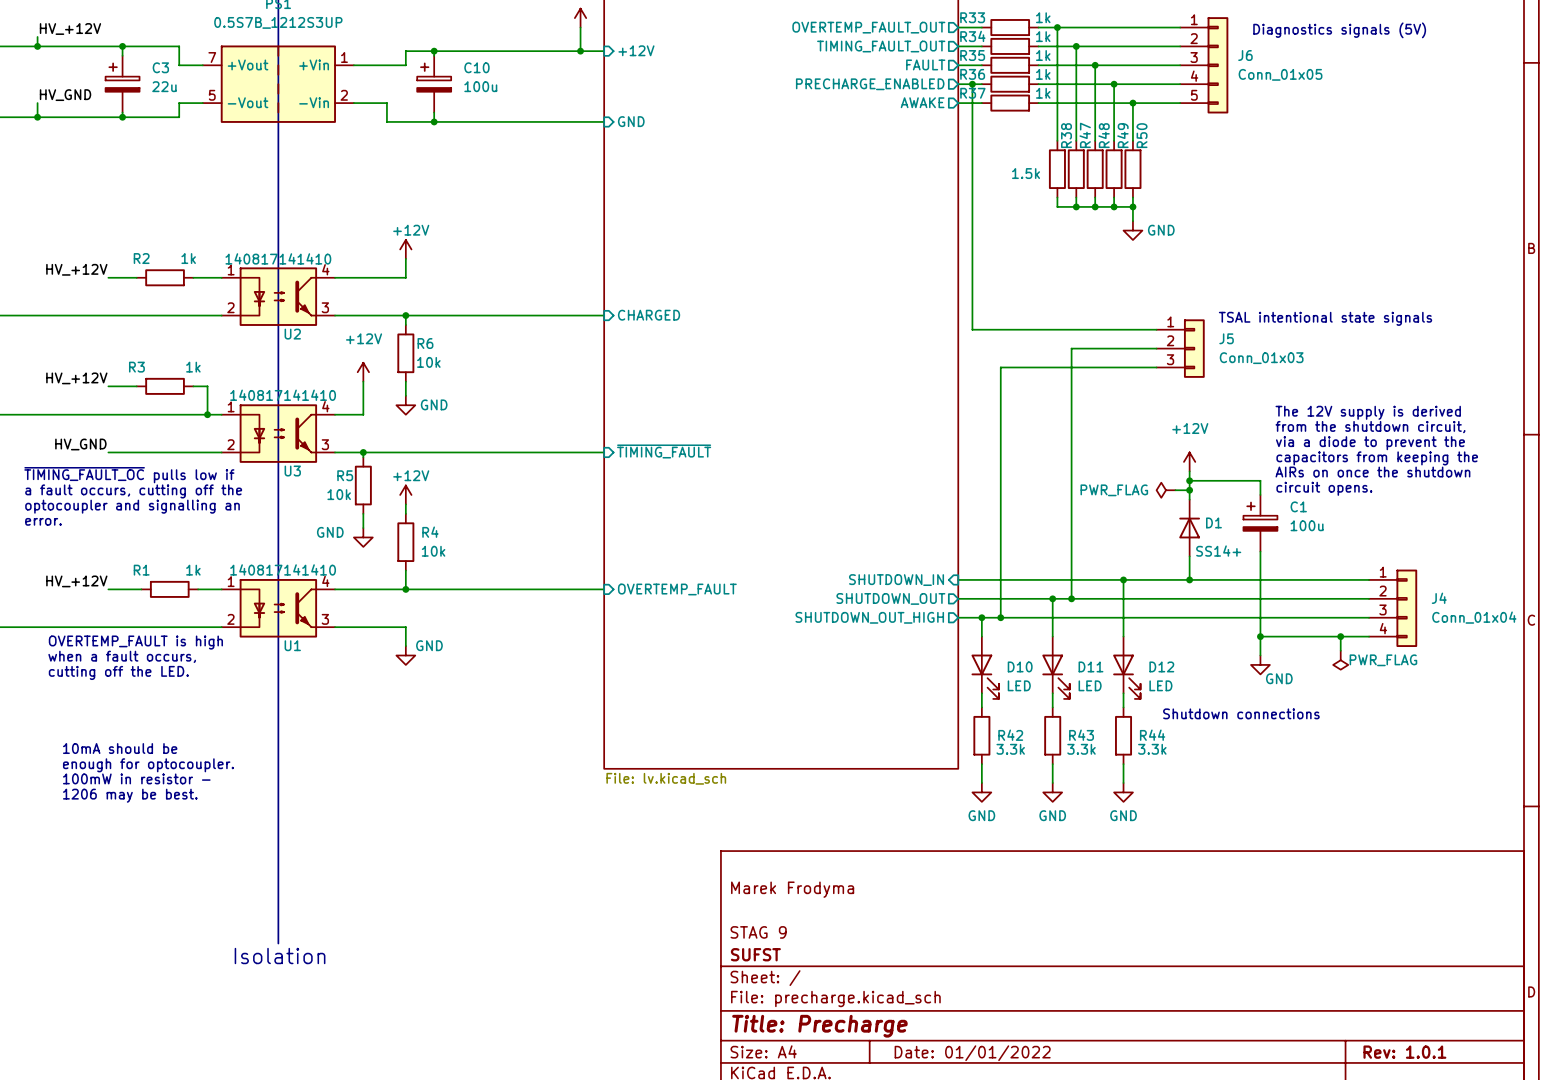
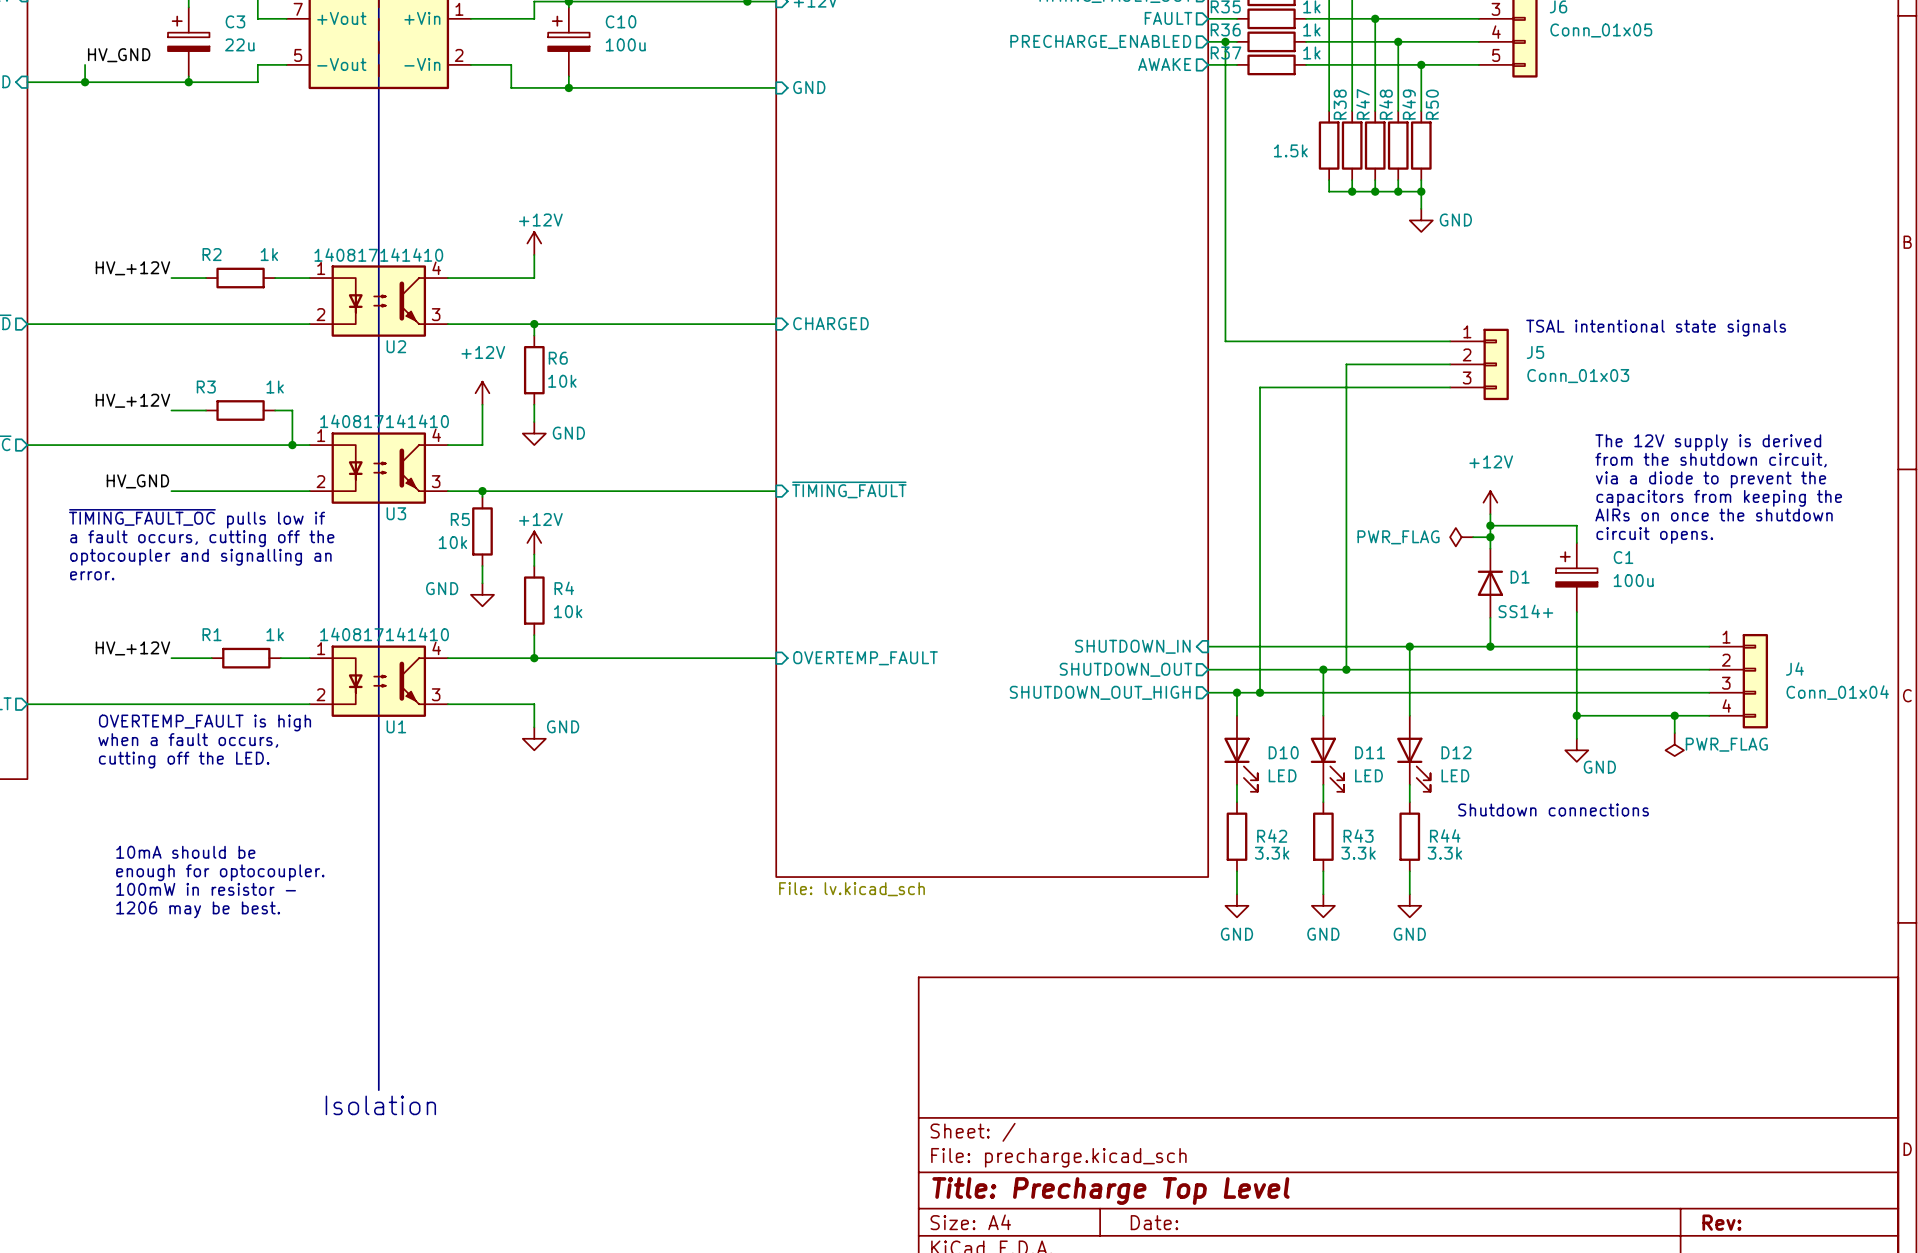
title block: Marek Frodyma (792, 889) -> none
title block: STAG 9 (758, 932) -> none
title block: SUFST (755, 954) -> none
title block: Title: Precharge (819, 1026) -> Title: Precharge Top Level (1110, 1191)
title block: Rev: 1.0.1 (1404, 1052) -> Rev: (1721, 1222)
title block: Date: 01/01/2022 (972, 1053) -> Date: (1154, 1222)

